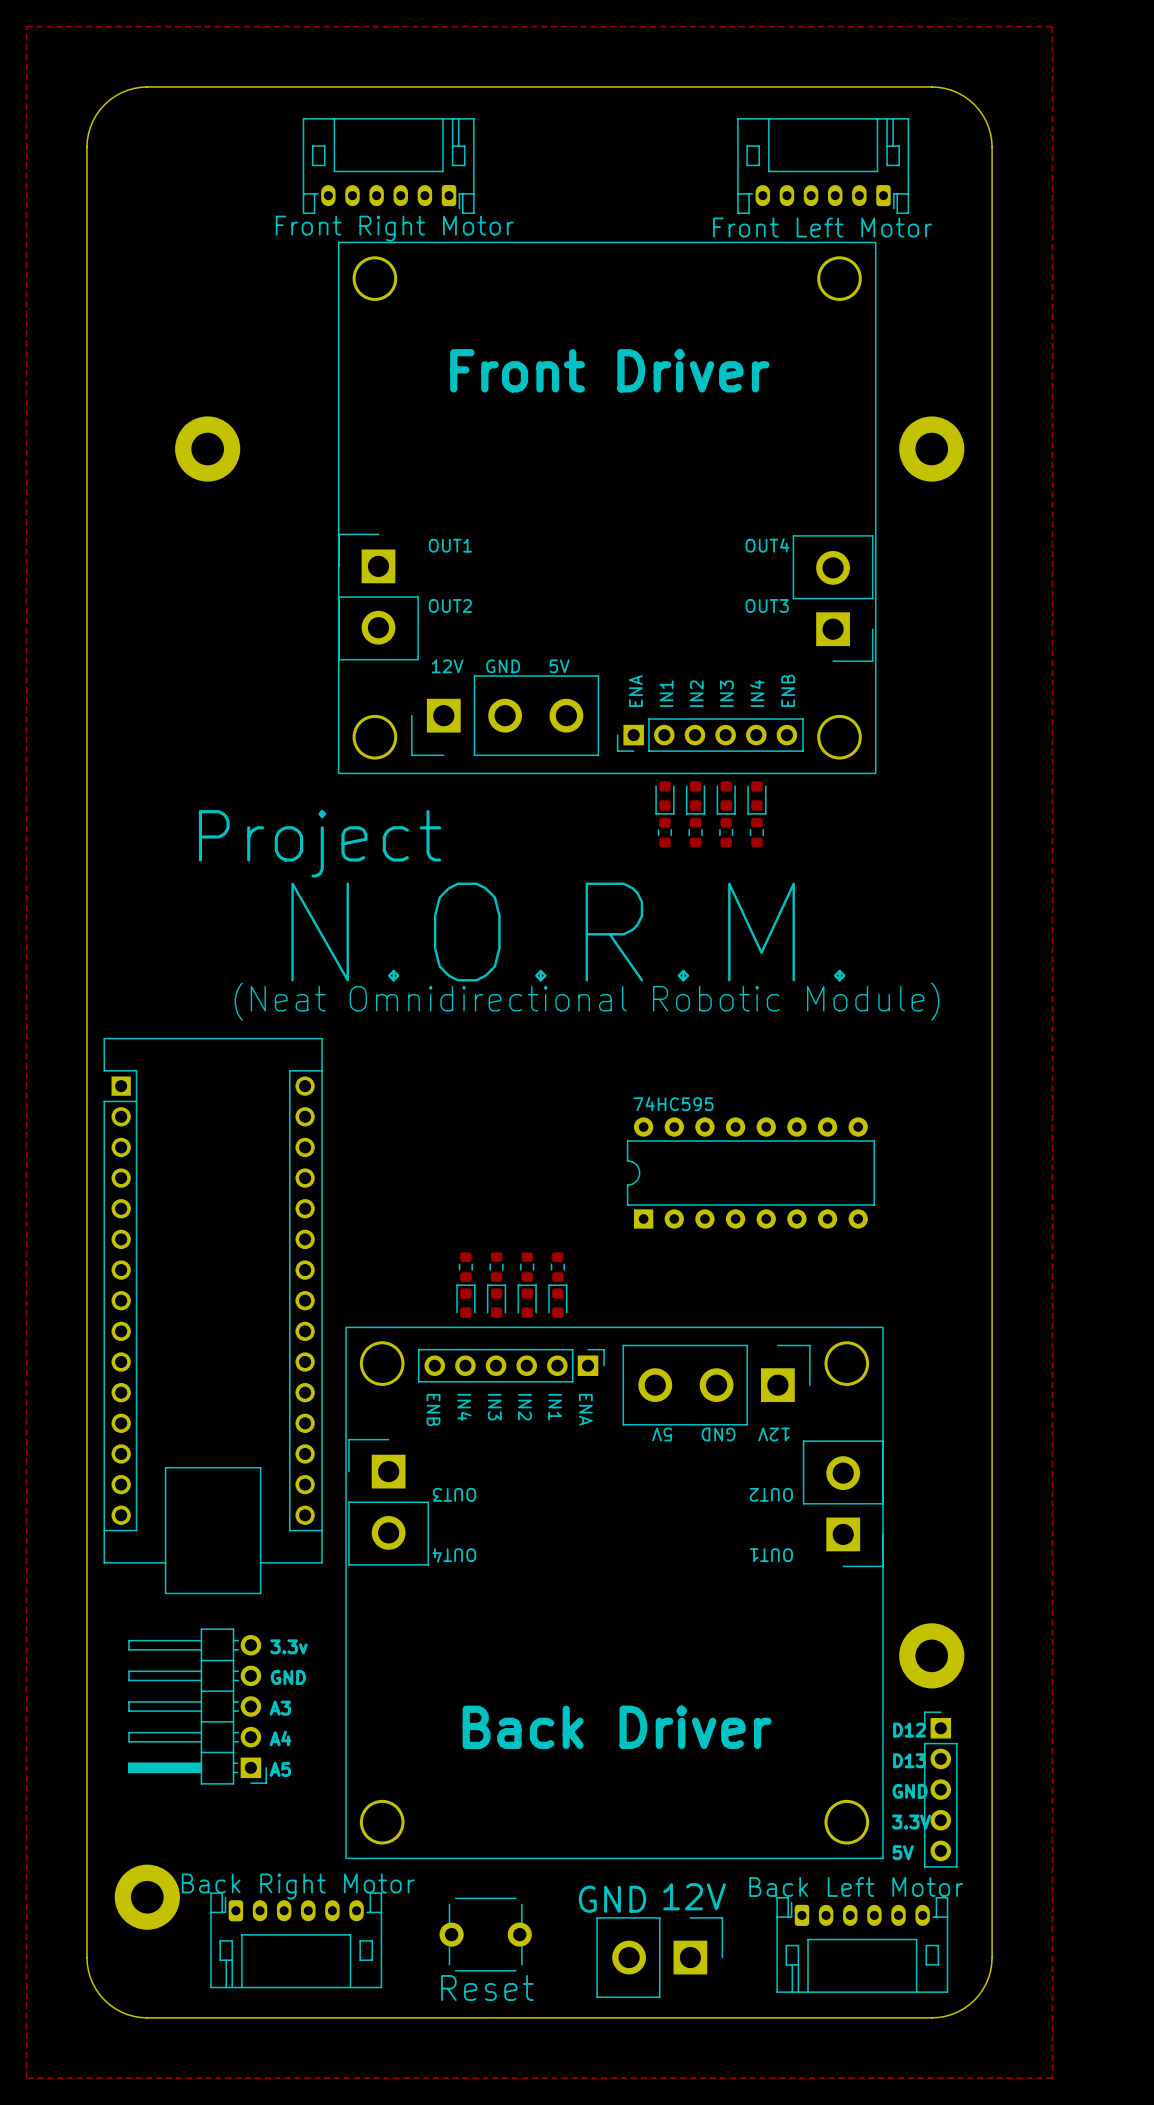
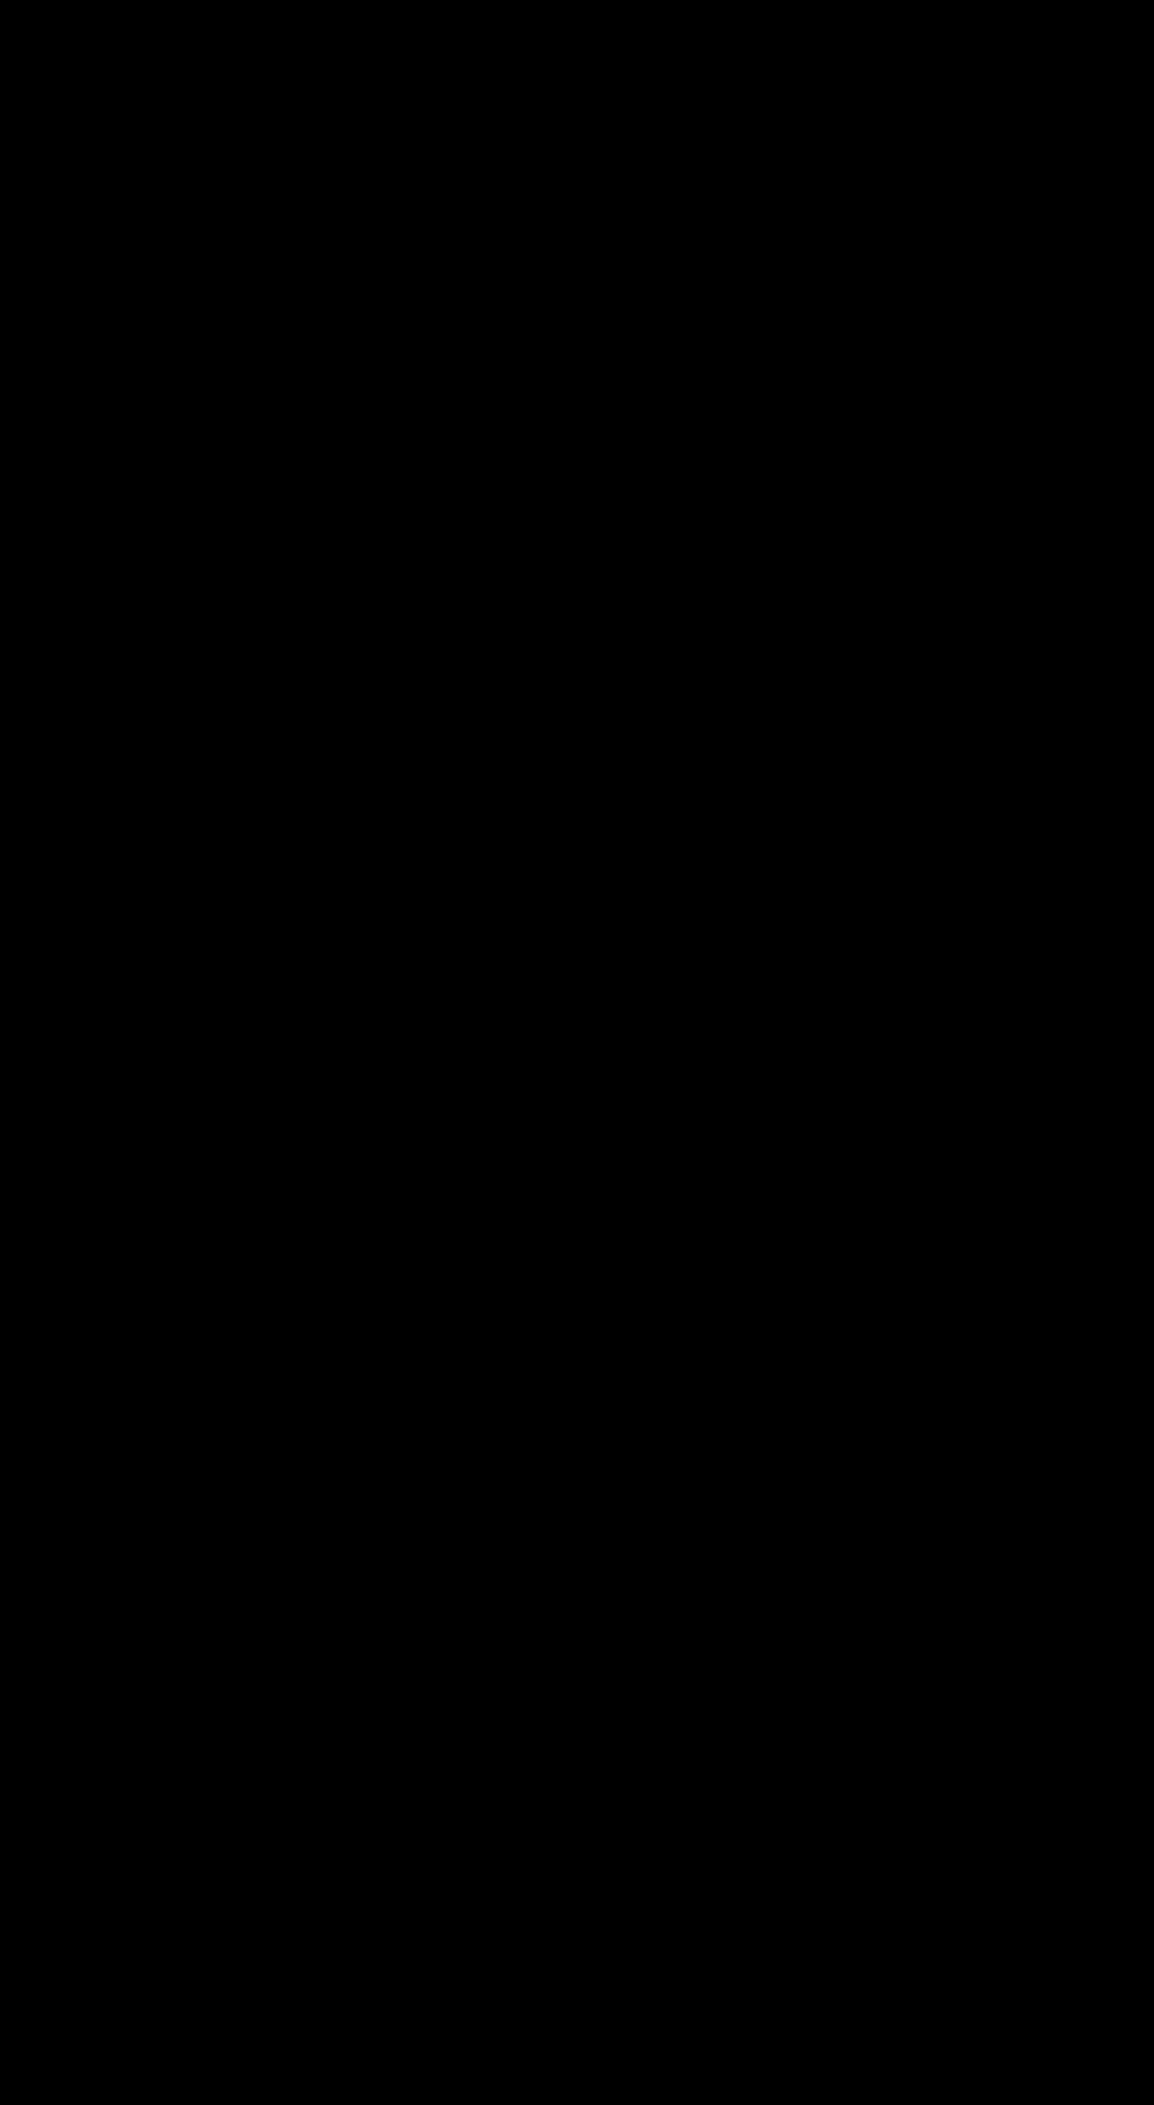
zone outline: (26, 26) (1052, 26) (1052, 2078) (26, 2078) (26, 26) -> none
board edge: (147, 86) (931, 86) (945, 88) (963, 96) (978, 109) (986, 121) (990, 133) (992, 147) (992, 1957) (988, 1977) (982, 1989) (969, 2004) (957, 2011) (945, 2016) (931, 2017) (147, 2017) (127, 2014) (115, 2008) (104, 2000) (92, 1983) (88, 1970) (86, 1957) (86, 147) (90, 127) (96, 115) (104, 104) (115, 96) (127, 90) (147, 86) -> none
part: Front Right Motor (388, 166) -> none
part: Front Left Motor (823, 166) -> none
part: (207, 449) -> none
part: (931, 449) -> none
part: Front Driver (607, 507) -> none
part: (664, 797) -> none
part: (695, 797) -> none
part: (726, 797) -> none
part: (756, 797) -> none
part: (664, 832) -> none
part: (695, 832) -> none
part: (726, 832) -> none
part: (756, 832) -> none
text: Project (319, 843) -> none
text: N.O.R.M. (568, 932) -> none
text: (Neat Omnidirectional Robotic Module) (587, 1001) -> none
part: 74HC595 (750, 1173) -> none
part: (465, 1267) -> none
part: (496, 1267) -> none
part: (527, 1267) -> none
part: (557, 1267) -> none
part: (465, 1301) -> none
part: (496, 1301) -> none
part: (527, 1301) -> none
part: (557, 1301) -> none
part: (213, 1316) -> none
part: Back Driver (614, 1592) -> none
text: 3.3v (288, 1646) -> none
part: (931, 1655) -> none
text: GND (288, 1677) -> none
part: (197, 1706) -> none
text: A3 (280, 1708) -> none
text: D12 (909, 1730) -> none
text: A4 (280, 1738) -> none
text: D13 (909, 1760) -> none
text: A5 (280, 1769) -> none
part: (940, 1789) -> none
text: GND (910, 1791) -> none
text: 3.3V (911, 1822) -> none
text: 5V (903, 1852) -> none
text: 12V (694, 1896) -> none
part: (147, 1897) -> none
text: GND (612, 1899) -> none
part: Reset (485, 1934) -> none
part: Back Right Motor (296, 1940) -> none
part: Back Left Motor (862, 1944) -> none
part: (659, 1957) -> none

